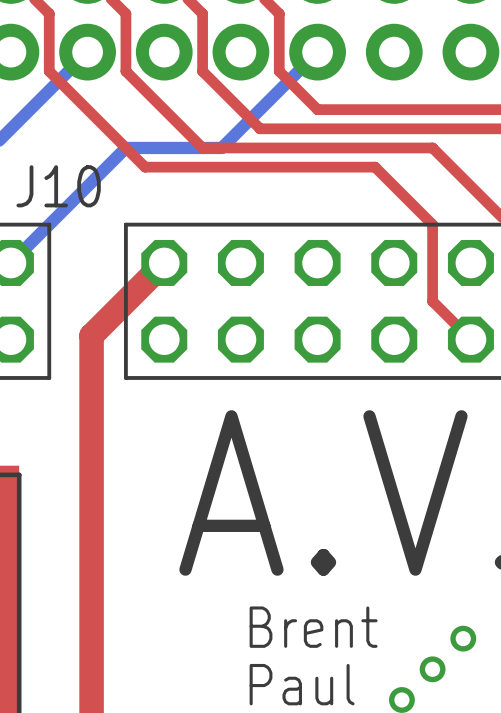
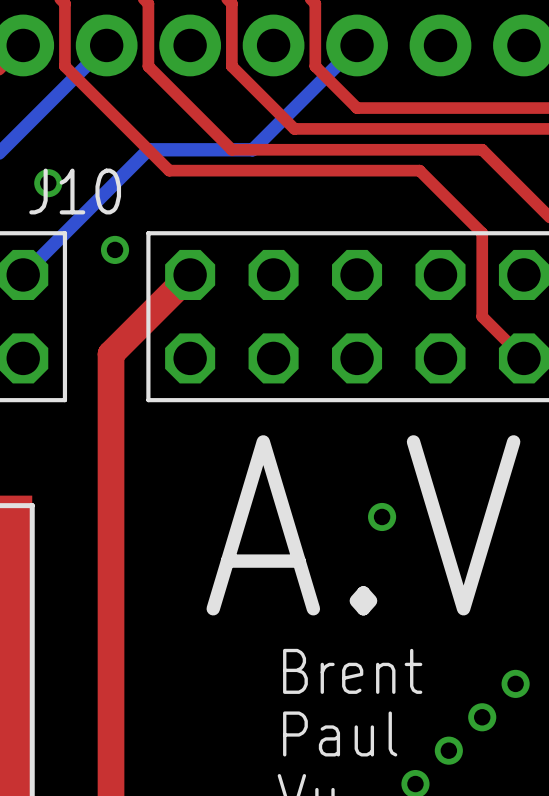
via: none -> (48, 183)
via: none -> (115, 249)
via: none -> (382, 516)

